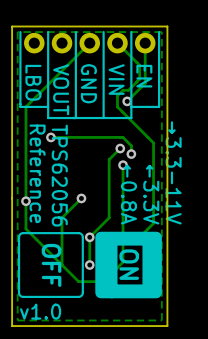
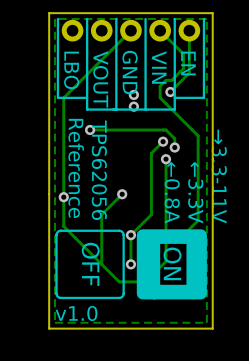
via: none -> (133, 94)
via: none -> (133, 106)

